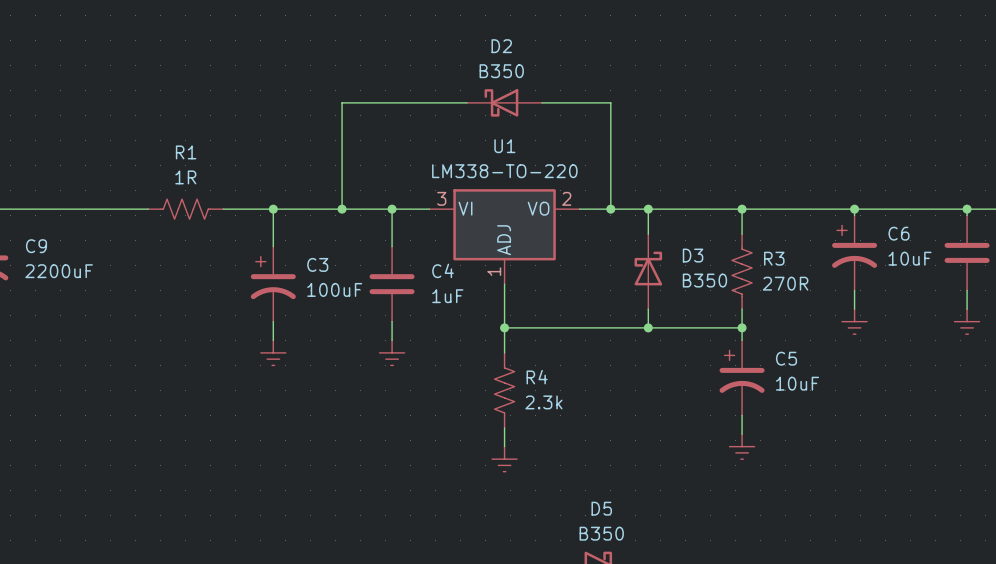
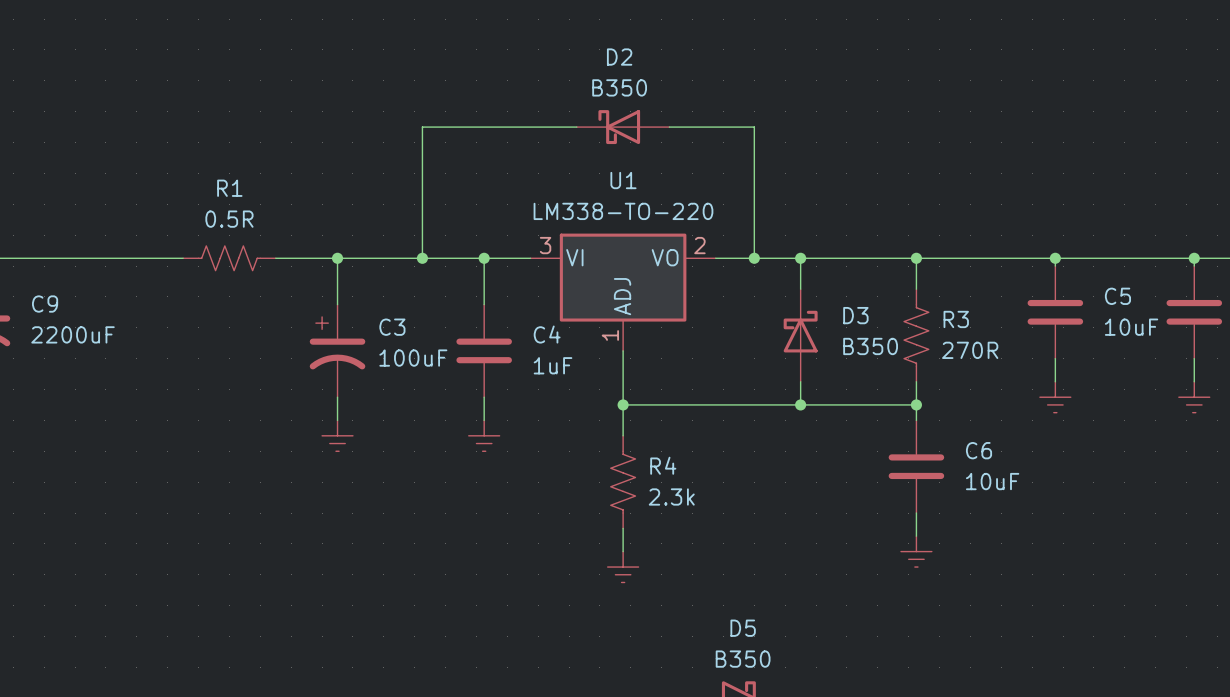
R1 value: 1R (185, 177) -> 0.5R (229, 219)
C6 symbol: [832, 215, 878, 291] -> [888, 420, 945, 514]
C5 symbol: [719, 340, 765, 416] -> [1027, 266, 1084, 359]

